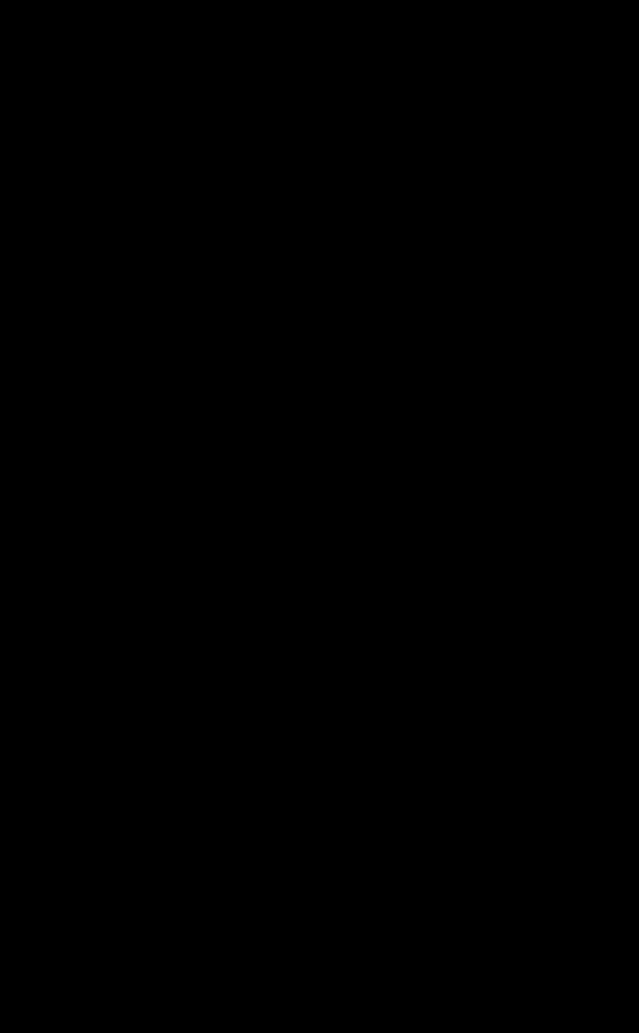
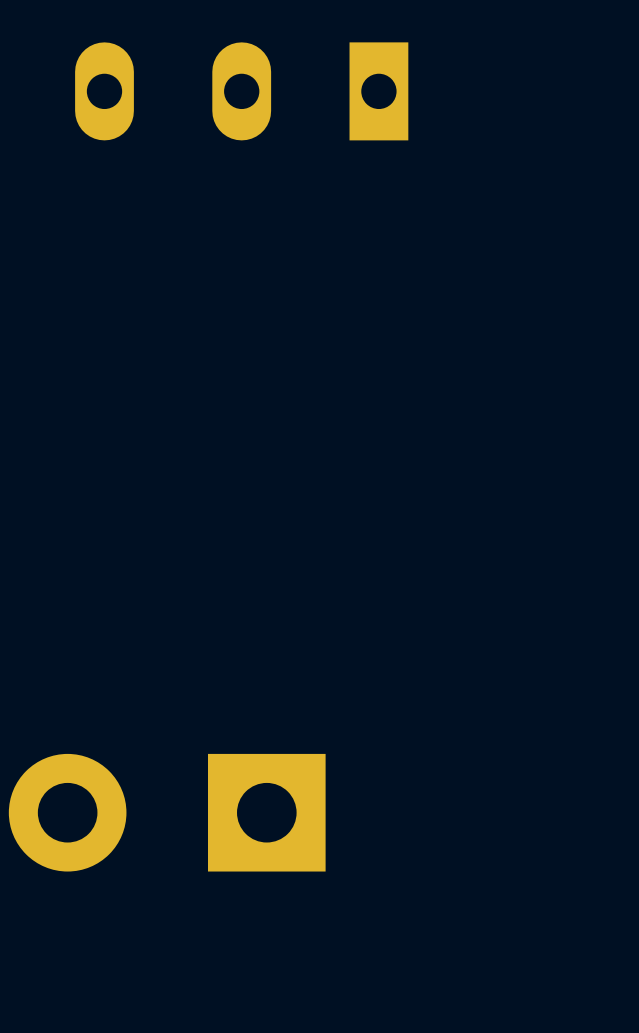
part: none -> (241, 91)
part: none -> (167, 812)

